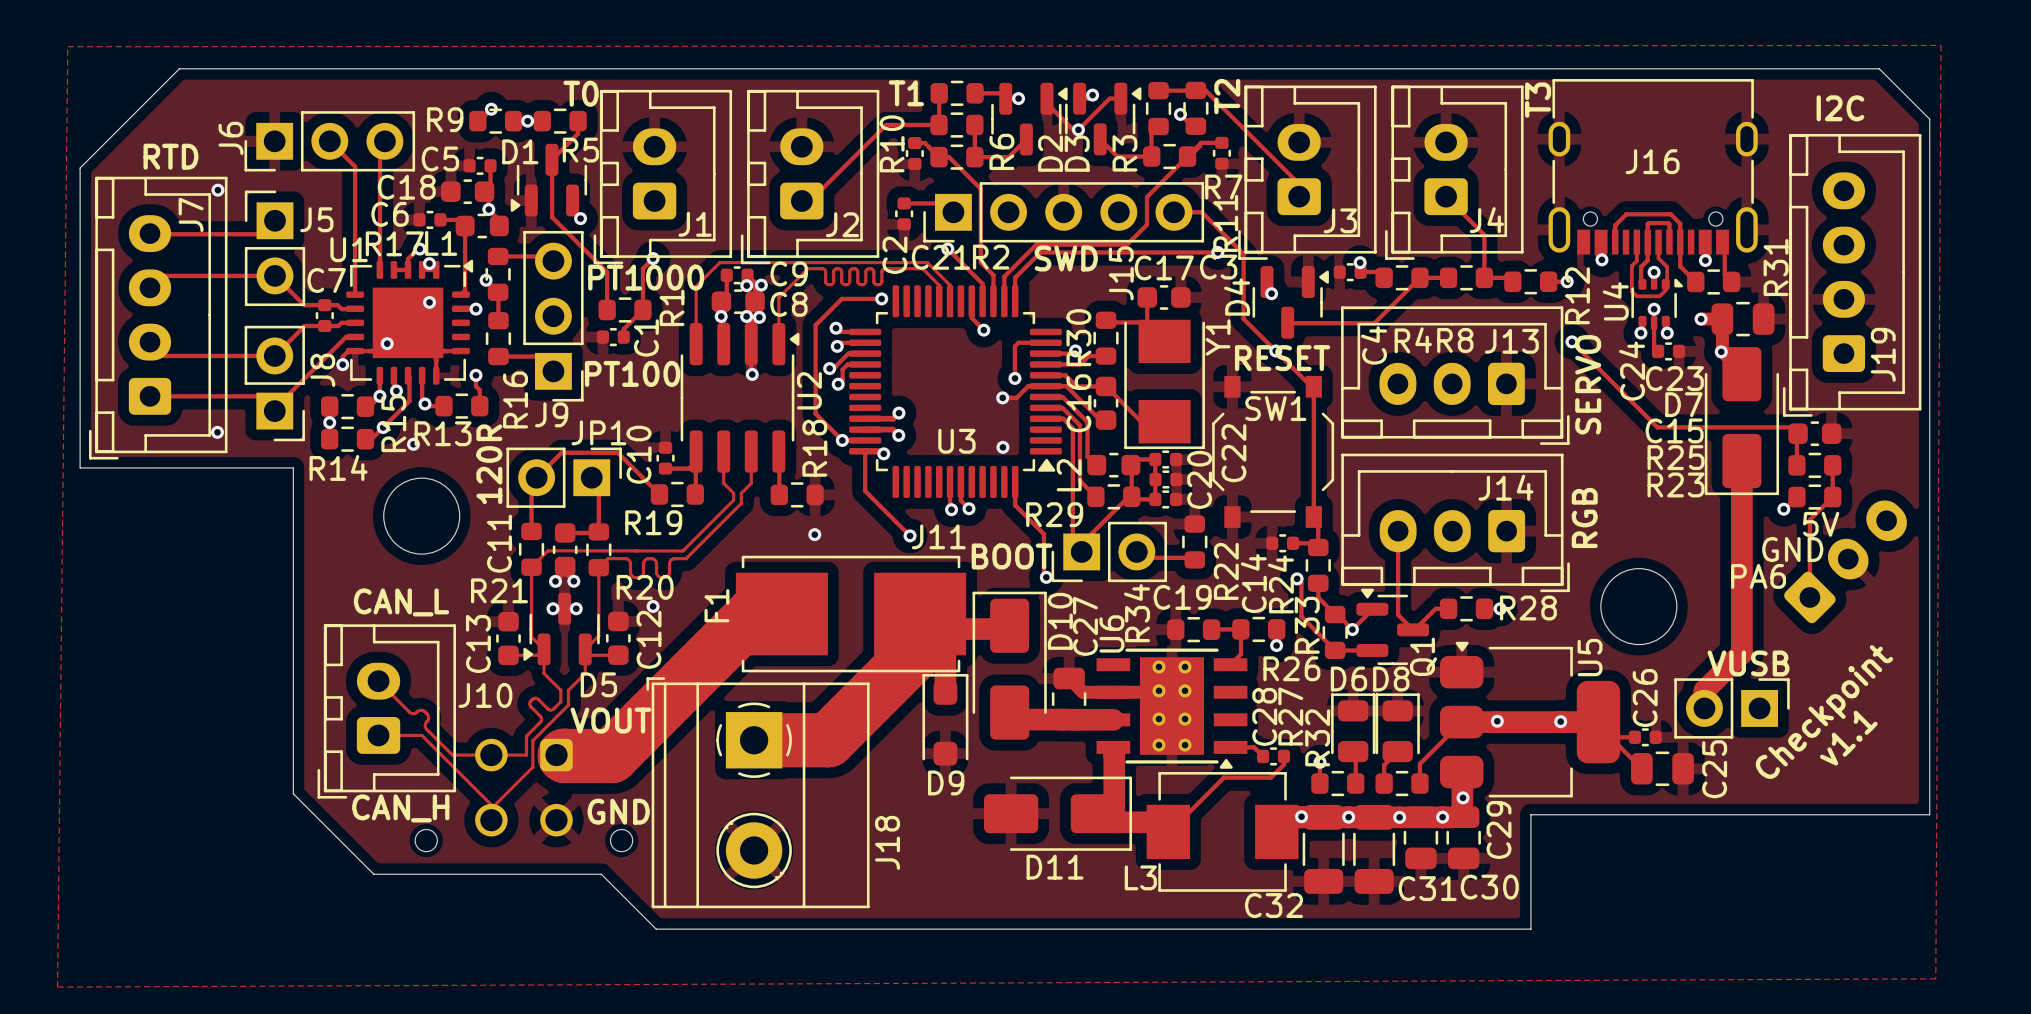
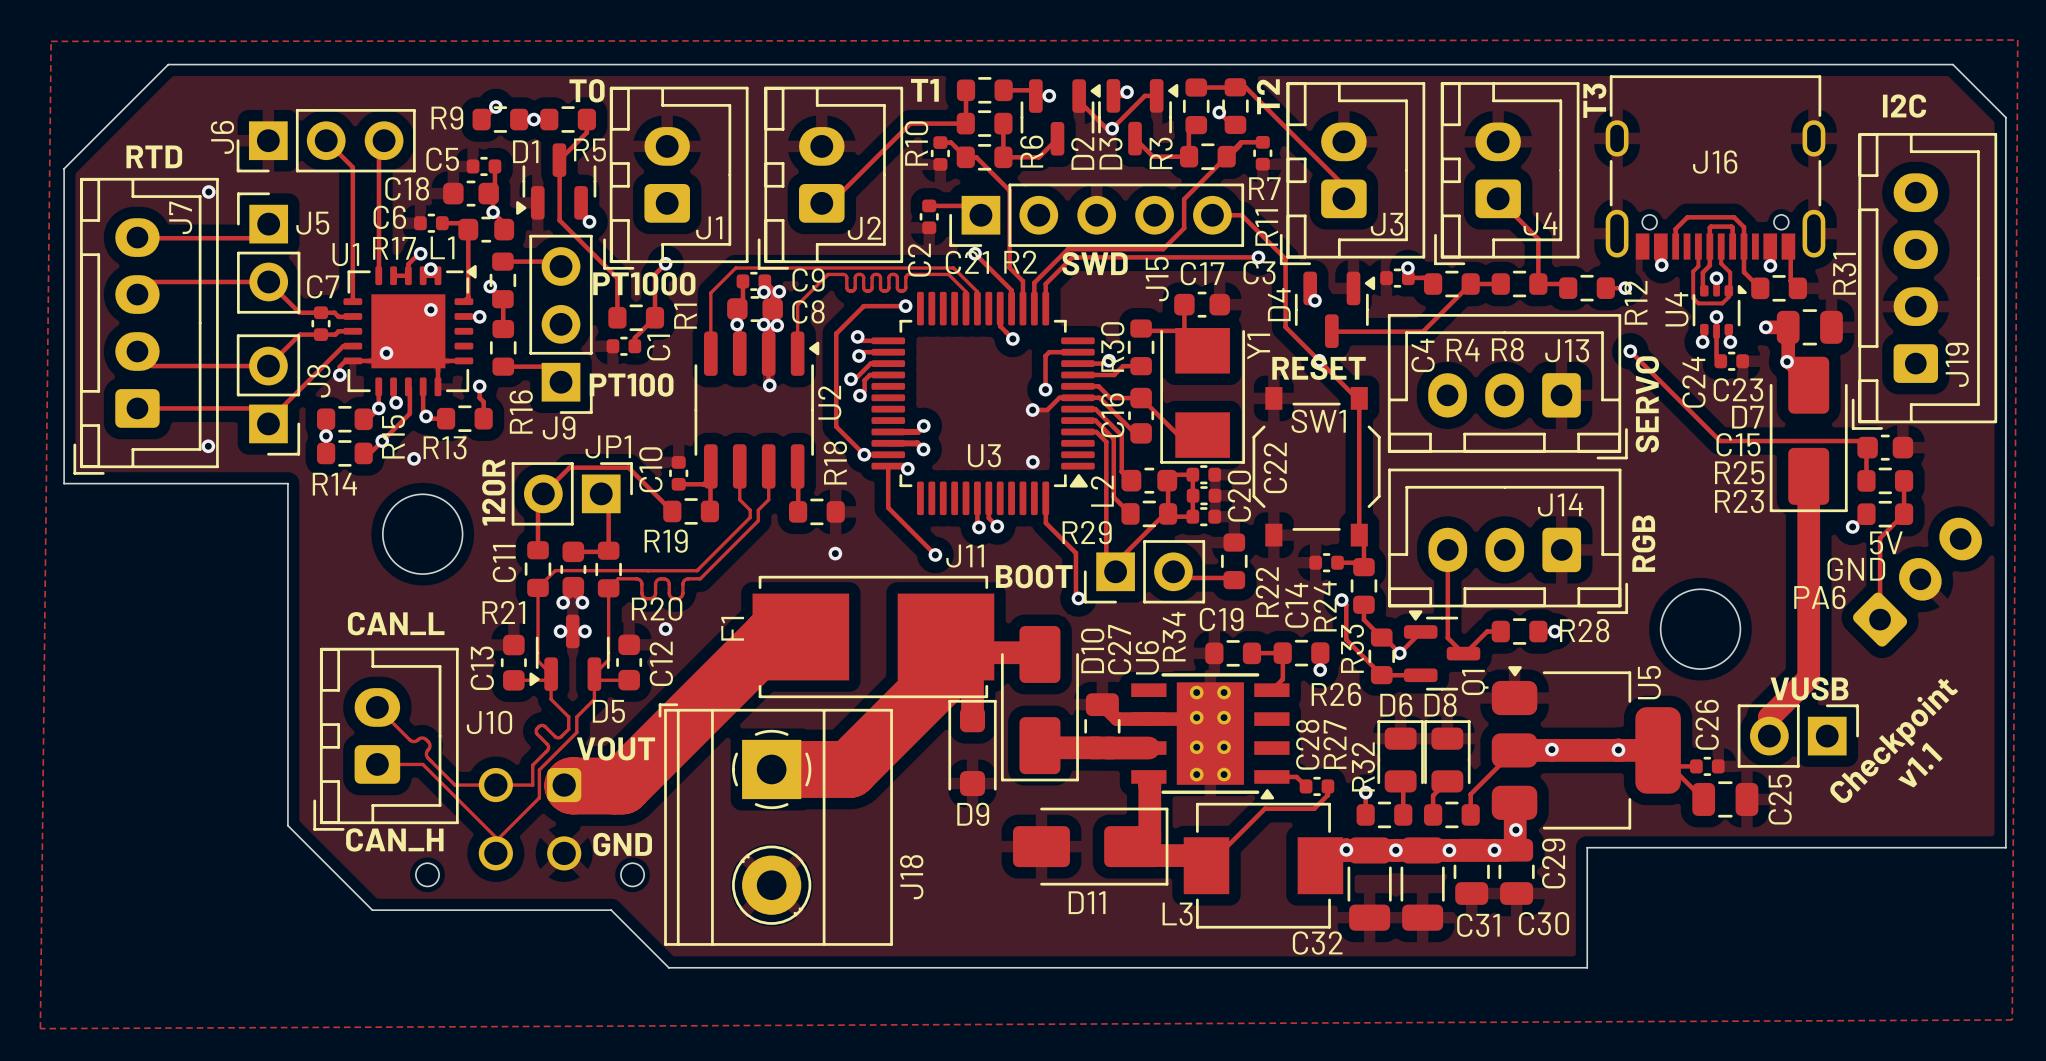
D10 rotation: 0° (1009, 665) -> 180° (1039, 703)

